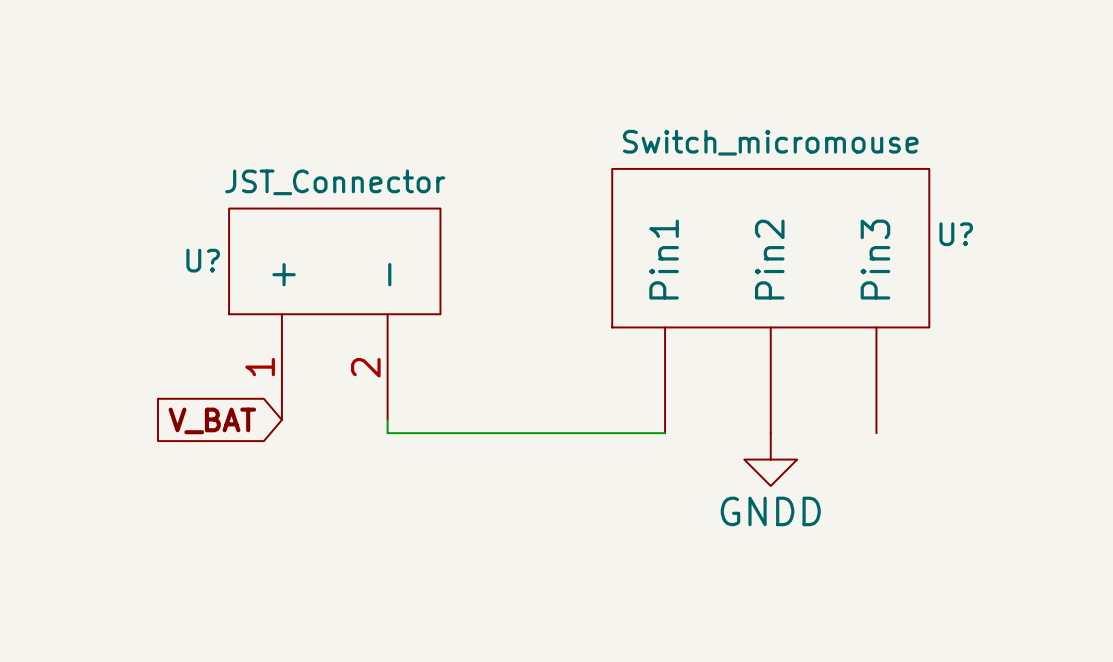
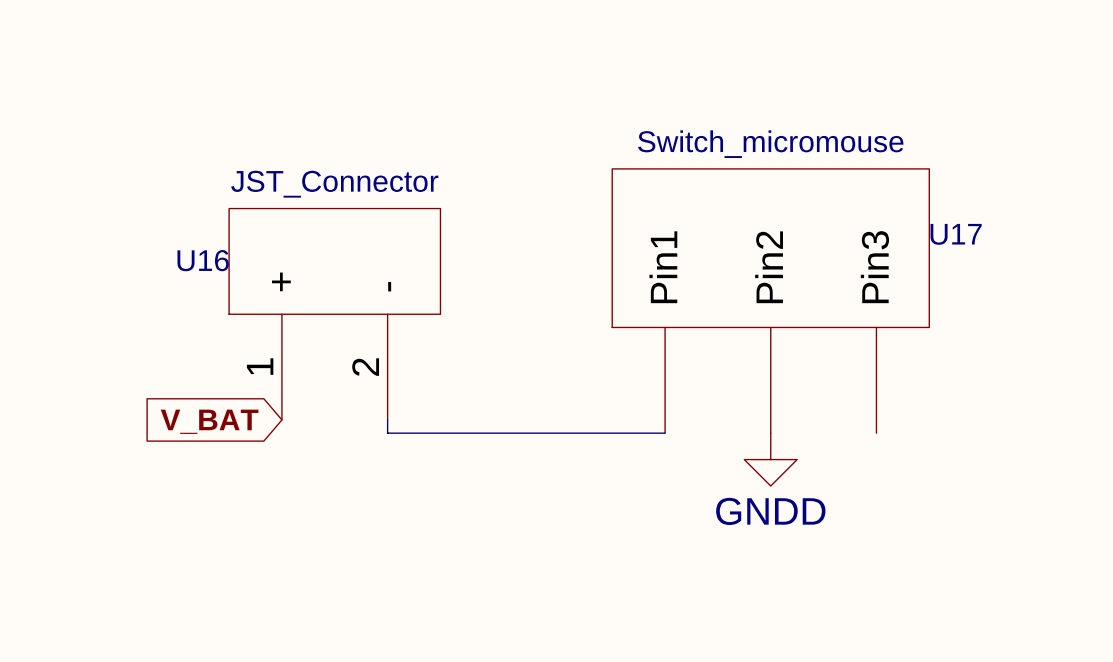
U? name: U? (956, 234) -> U17 (956, 234)
U? name: U? (203, 260) -> U16 (203, 260)

